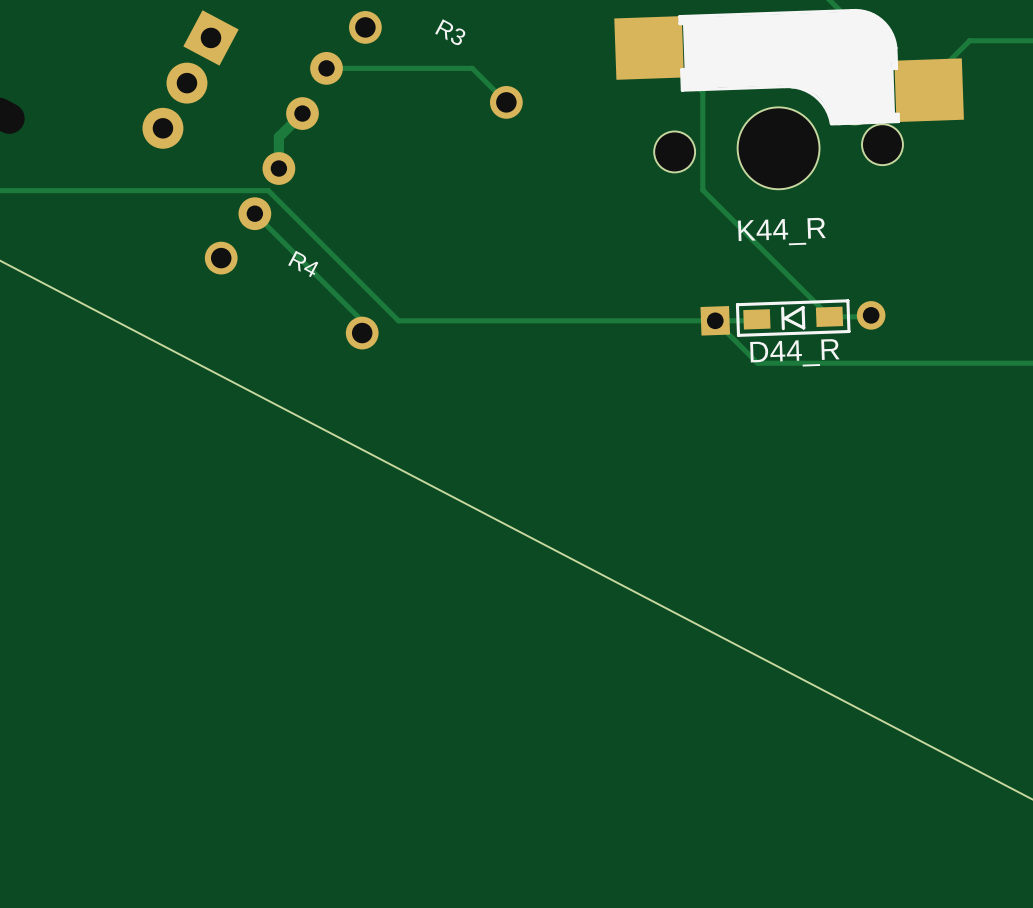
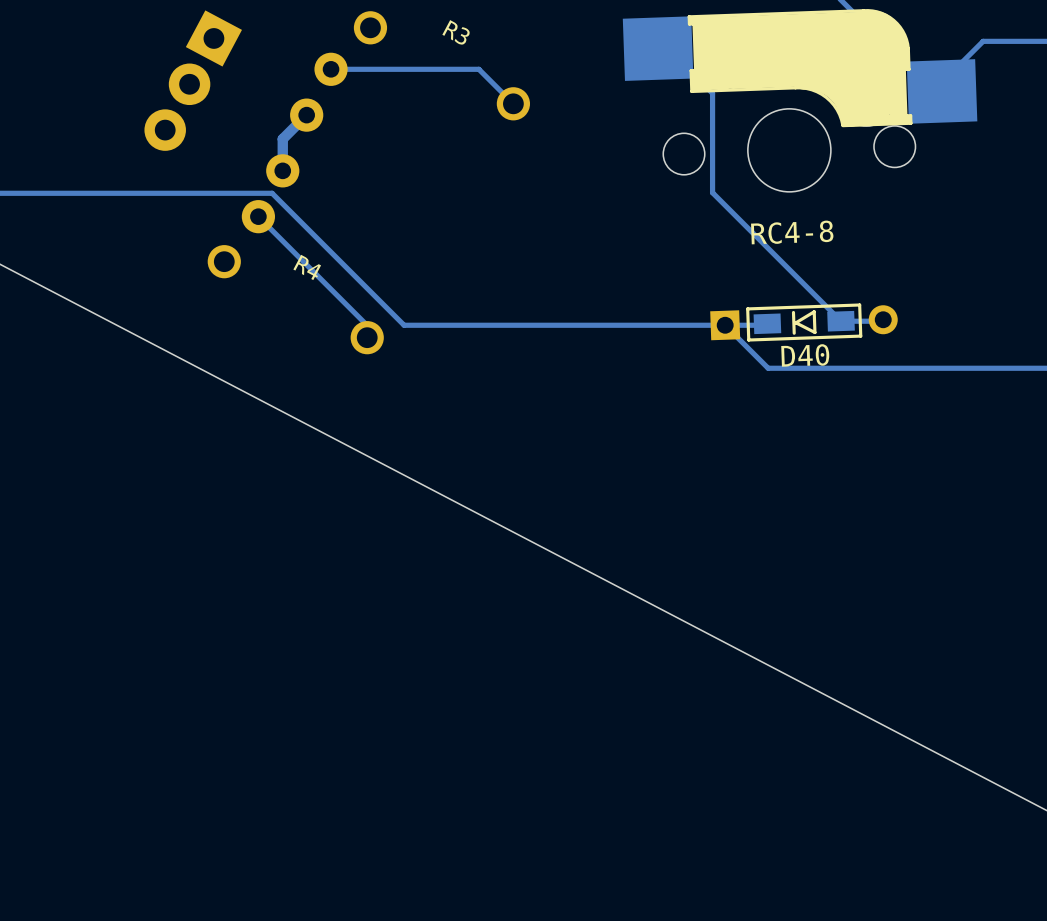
K44_R name: K44_R (781, 231) -> RC4-8 (792, 232)
D44_R name: D44_R (794, 352) -> D40 (805, 355)

